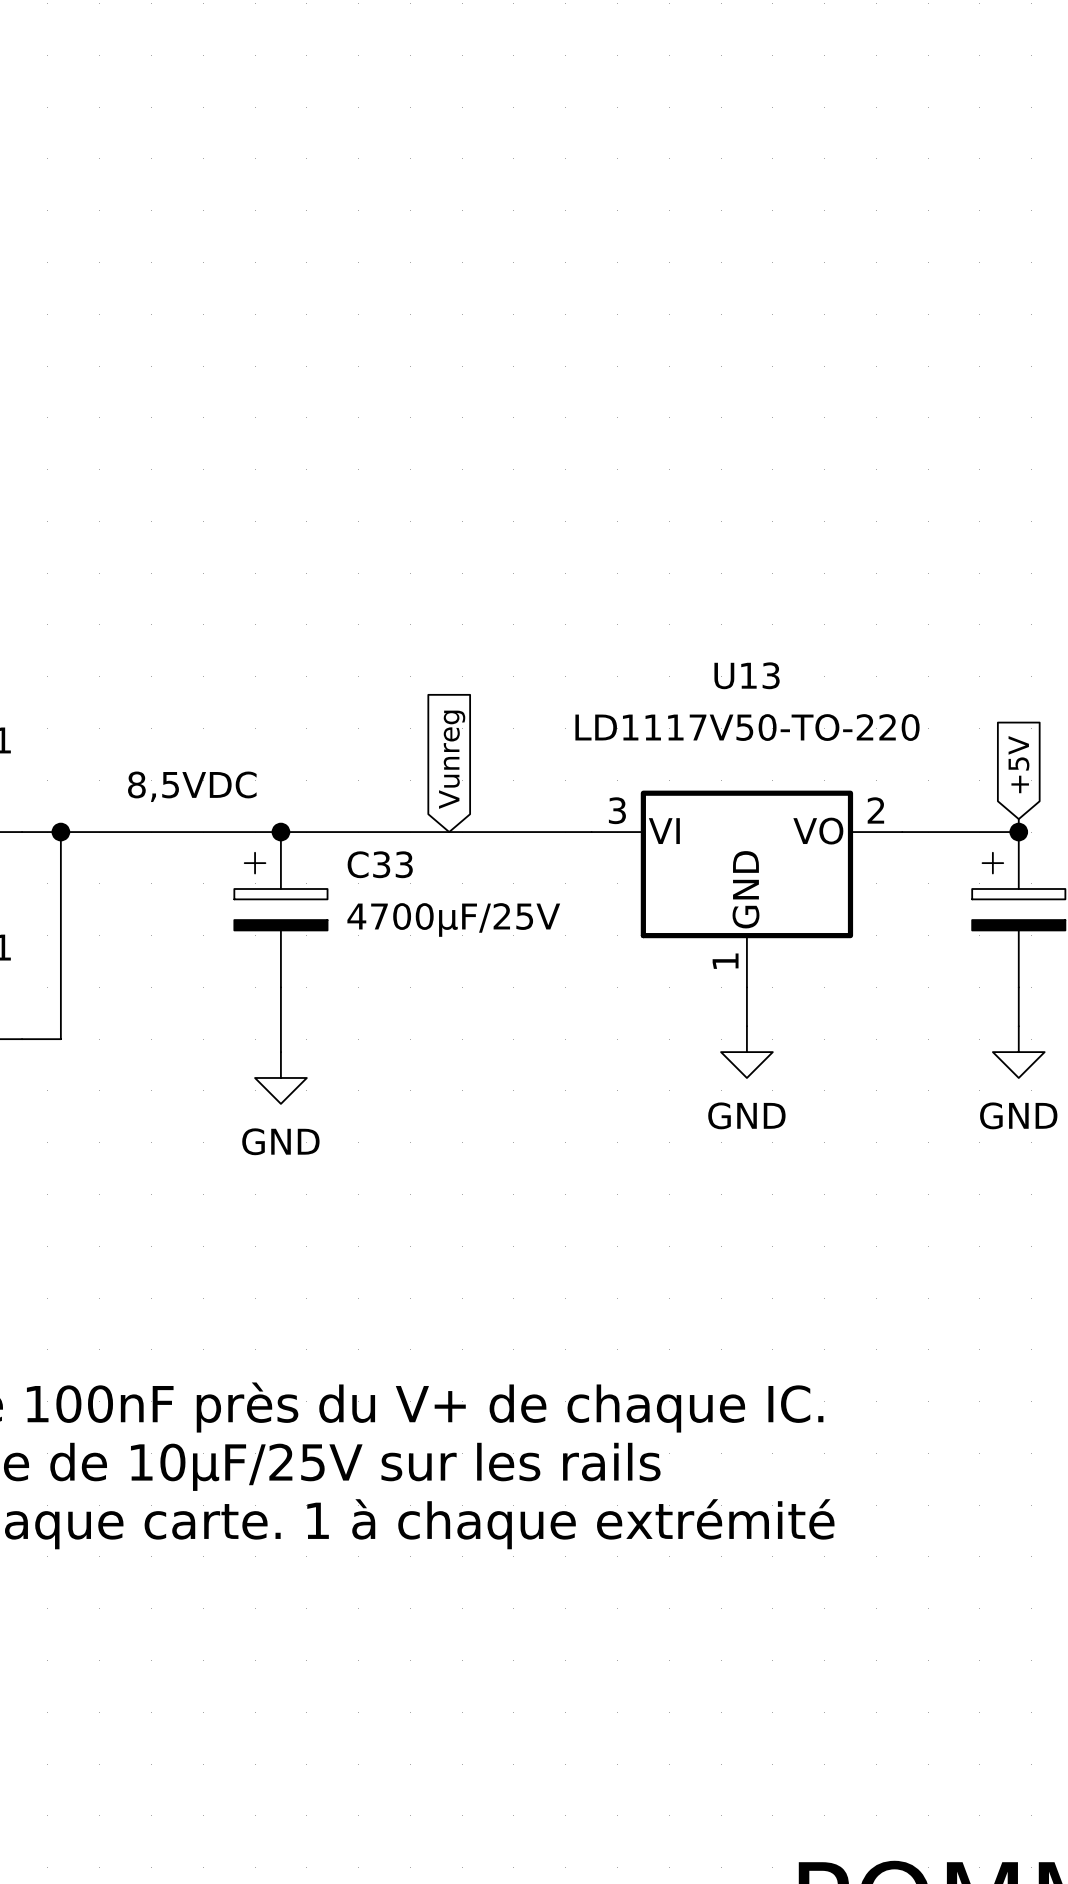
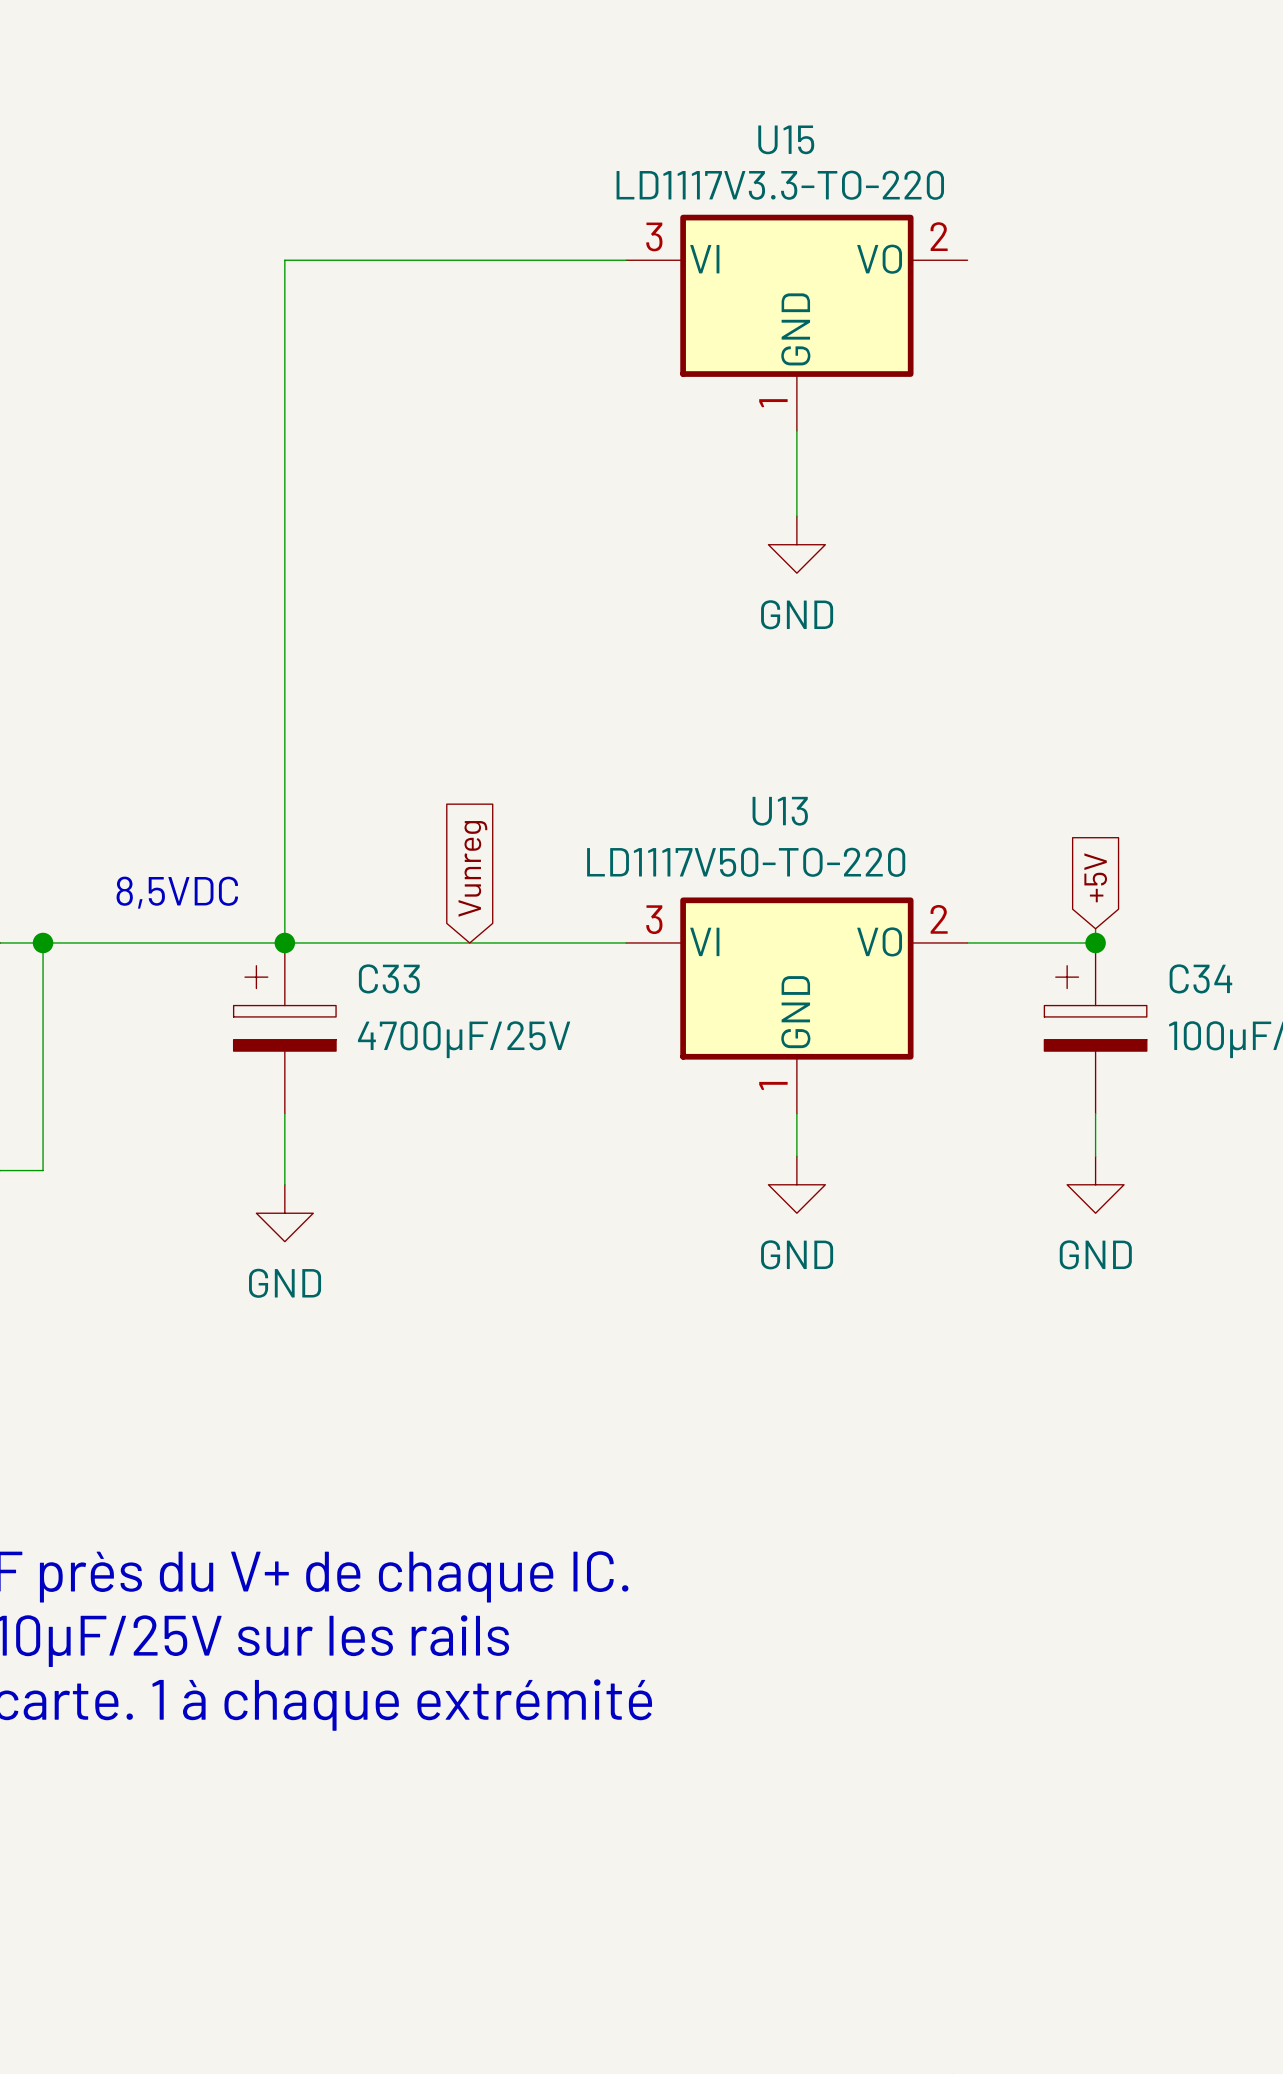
wire: none -> (626, 260) (284, 260) (284, 942)
U15: none -> LD1117V3.3-TO-220 (796, 322)
wire: none -> (796, 430) (796, 516)
power symbol: none -> GND (796, 544)
U13 name position: U13 (747, 675) -> U13 (780, 811)
U13 value position: LD1117V50-TO-220 (747, 727) -> LD1117V50-TO-220 (746, 862)

